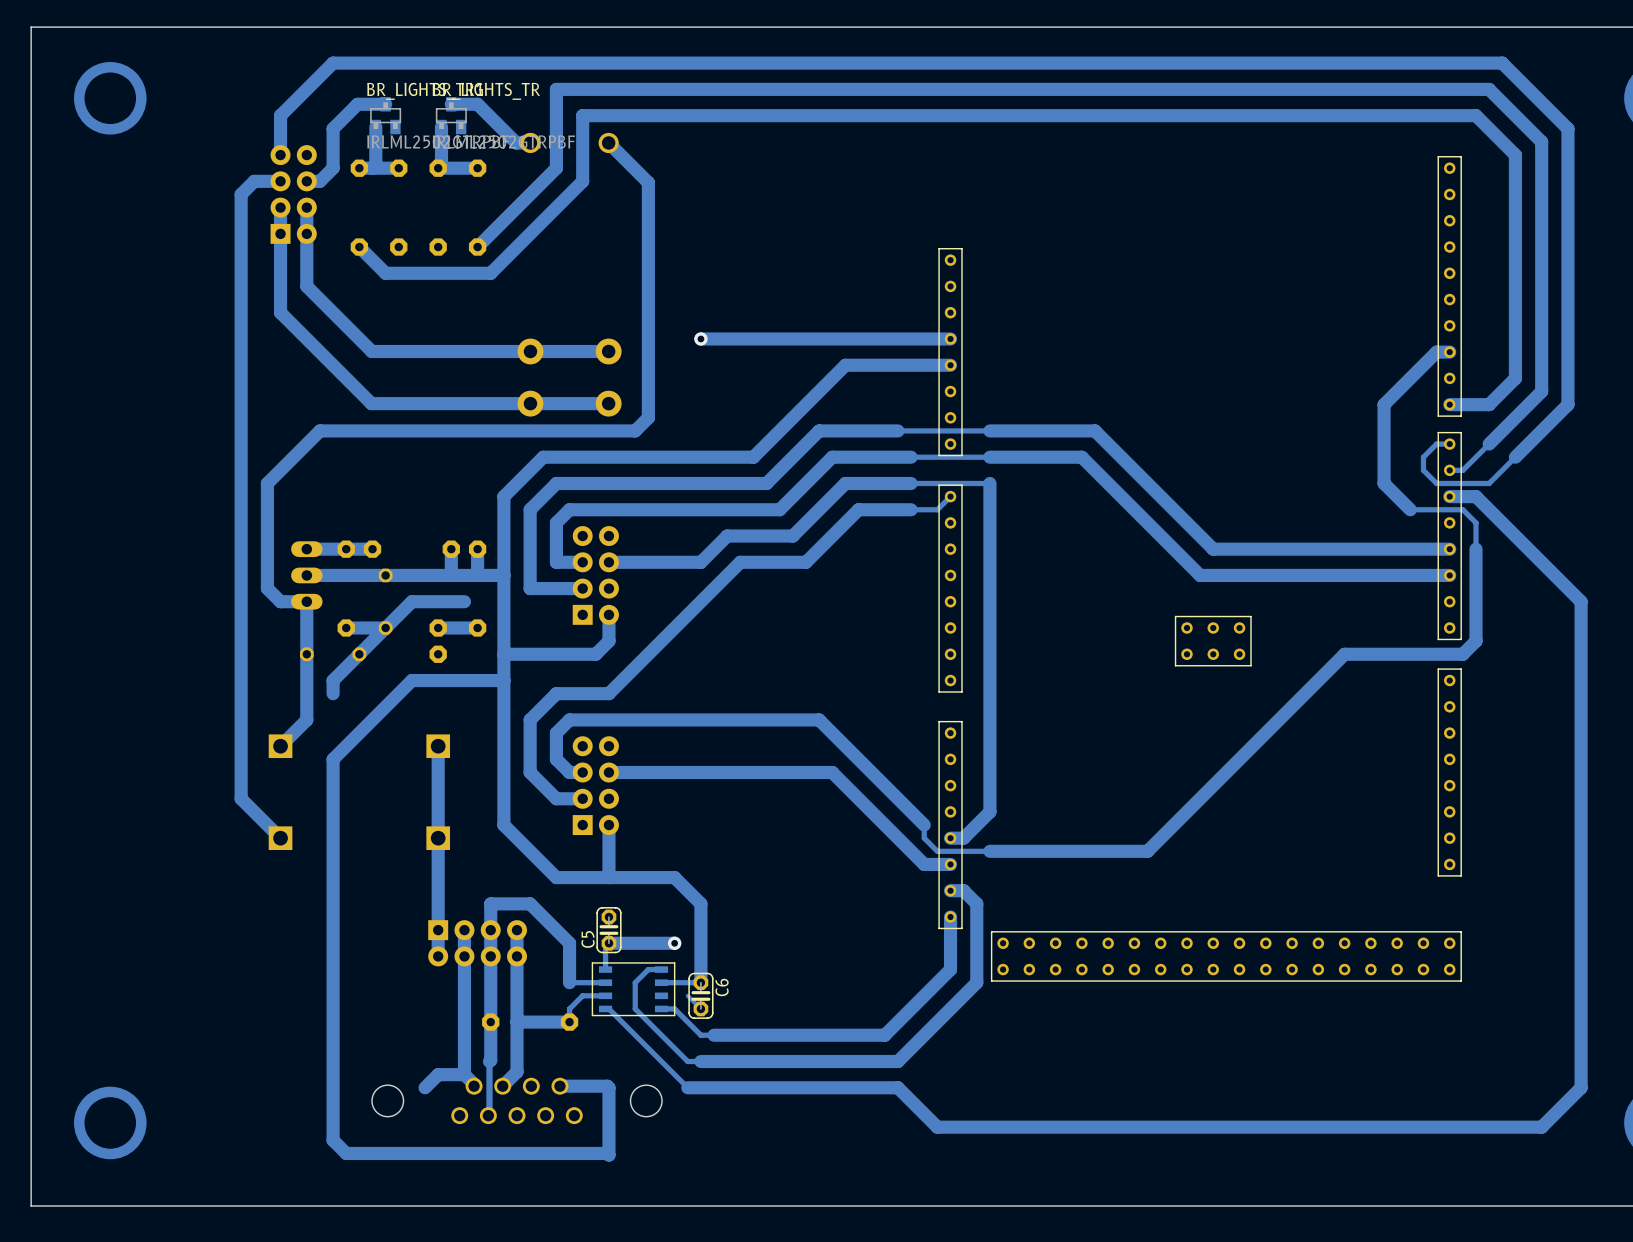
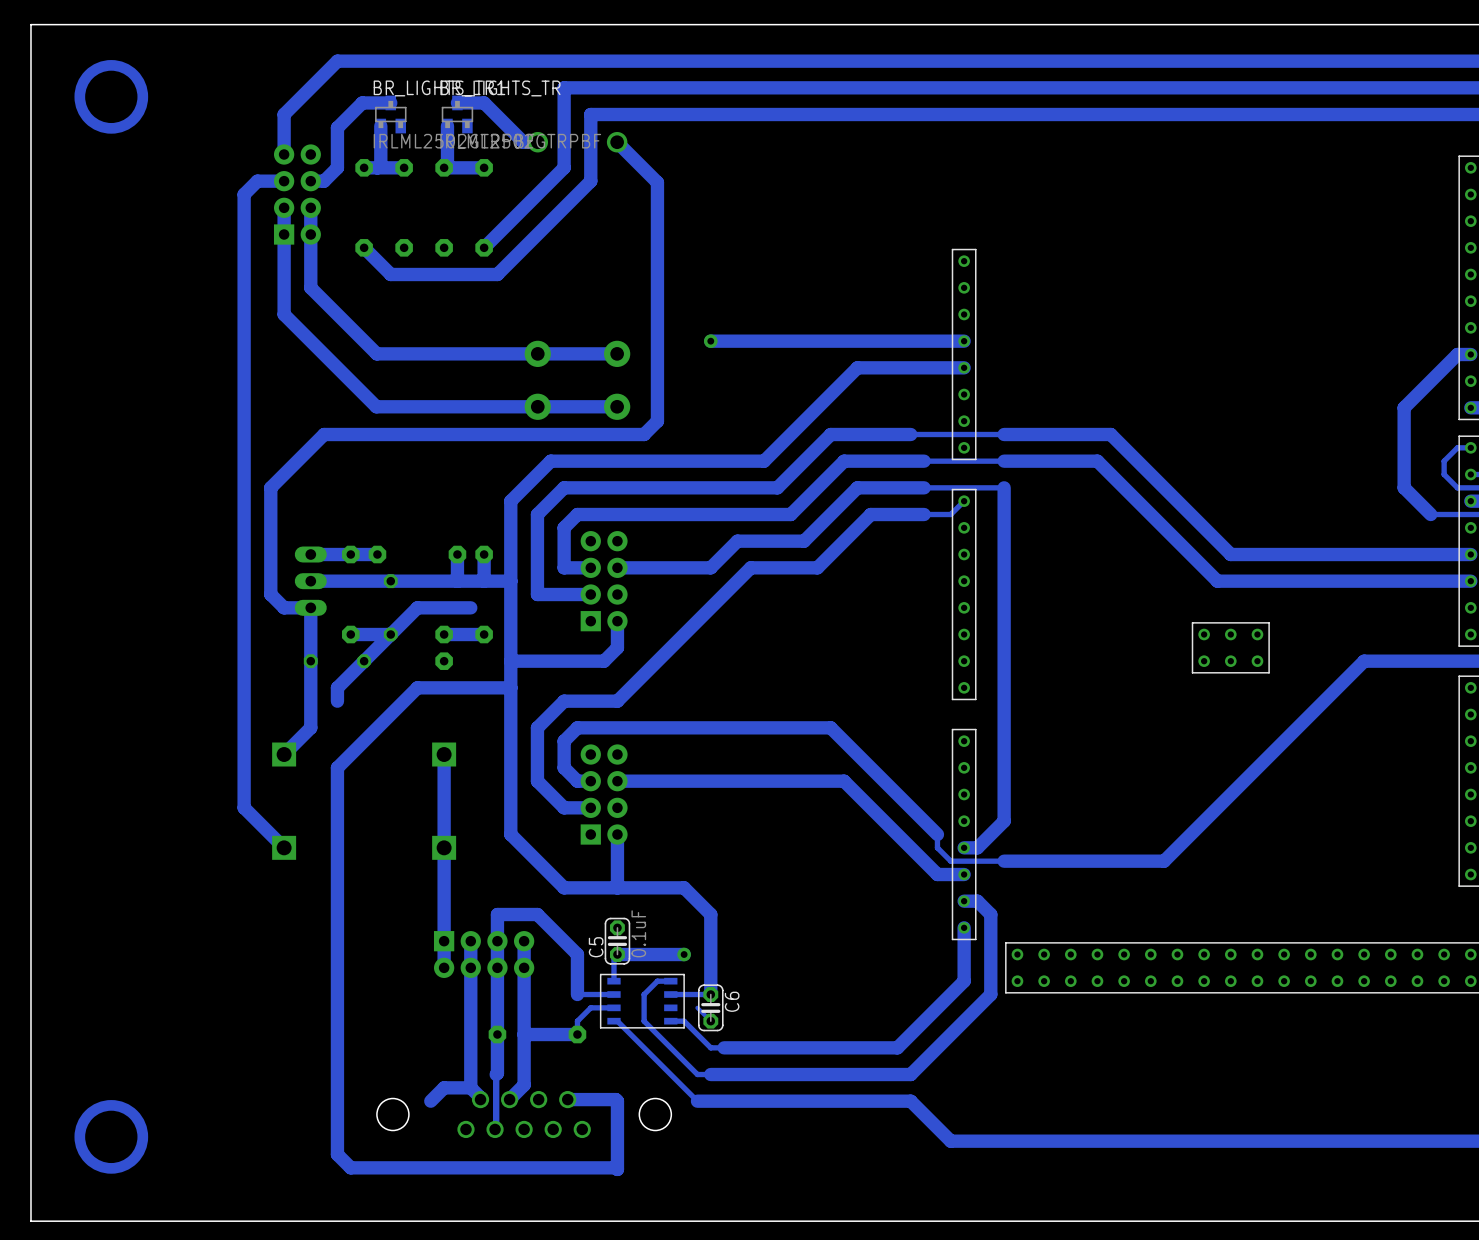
C5 value: none -> 0.1uF (638, 933)

